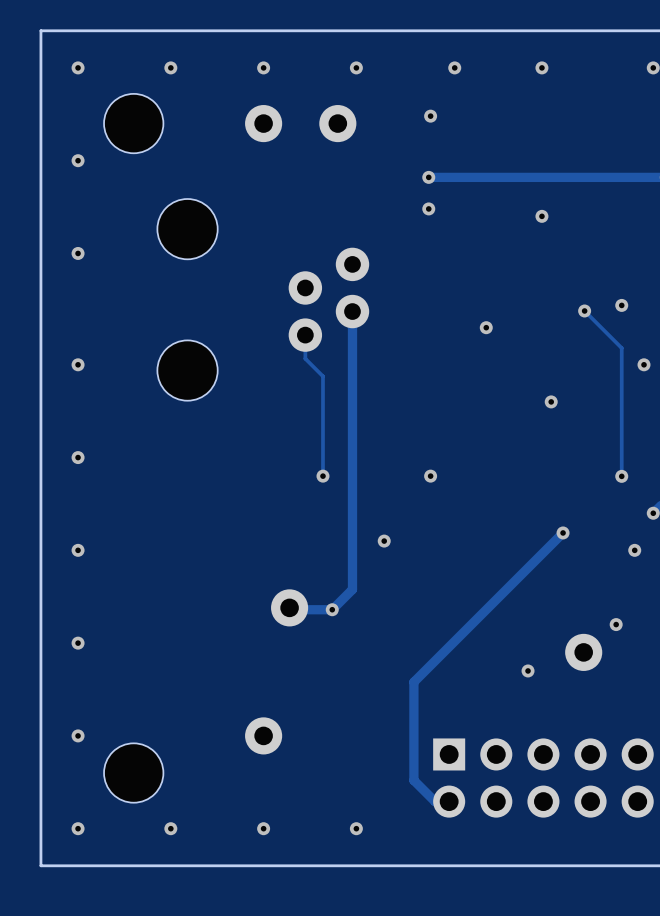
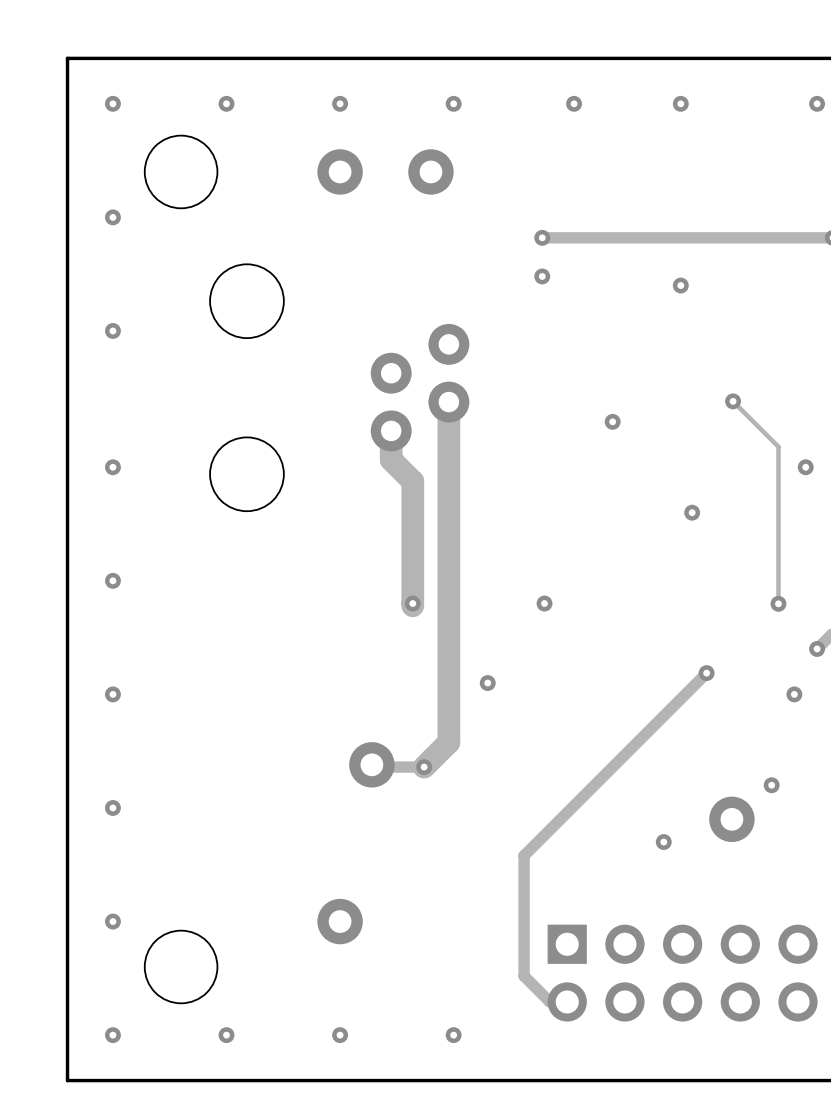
via: (430, 116) -> none
via: (621, 305) -> none
track width: thin (352, 311) (352, 589) (332, 609) -> thick (448, 402) (448, 742) (424, 767)
track width: thin (305, 335) (305, 358) (322, 376) (322, 477) -> thick (391, 430) (391, 459) (412, 481) (412, 605)

